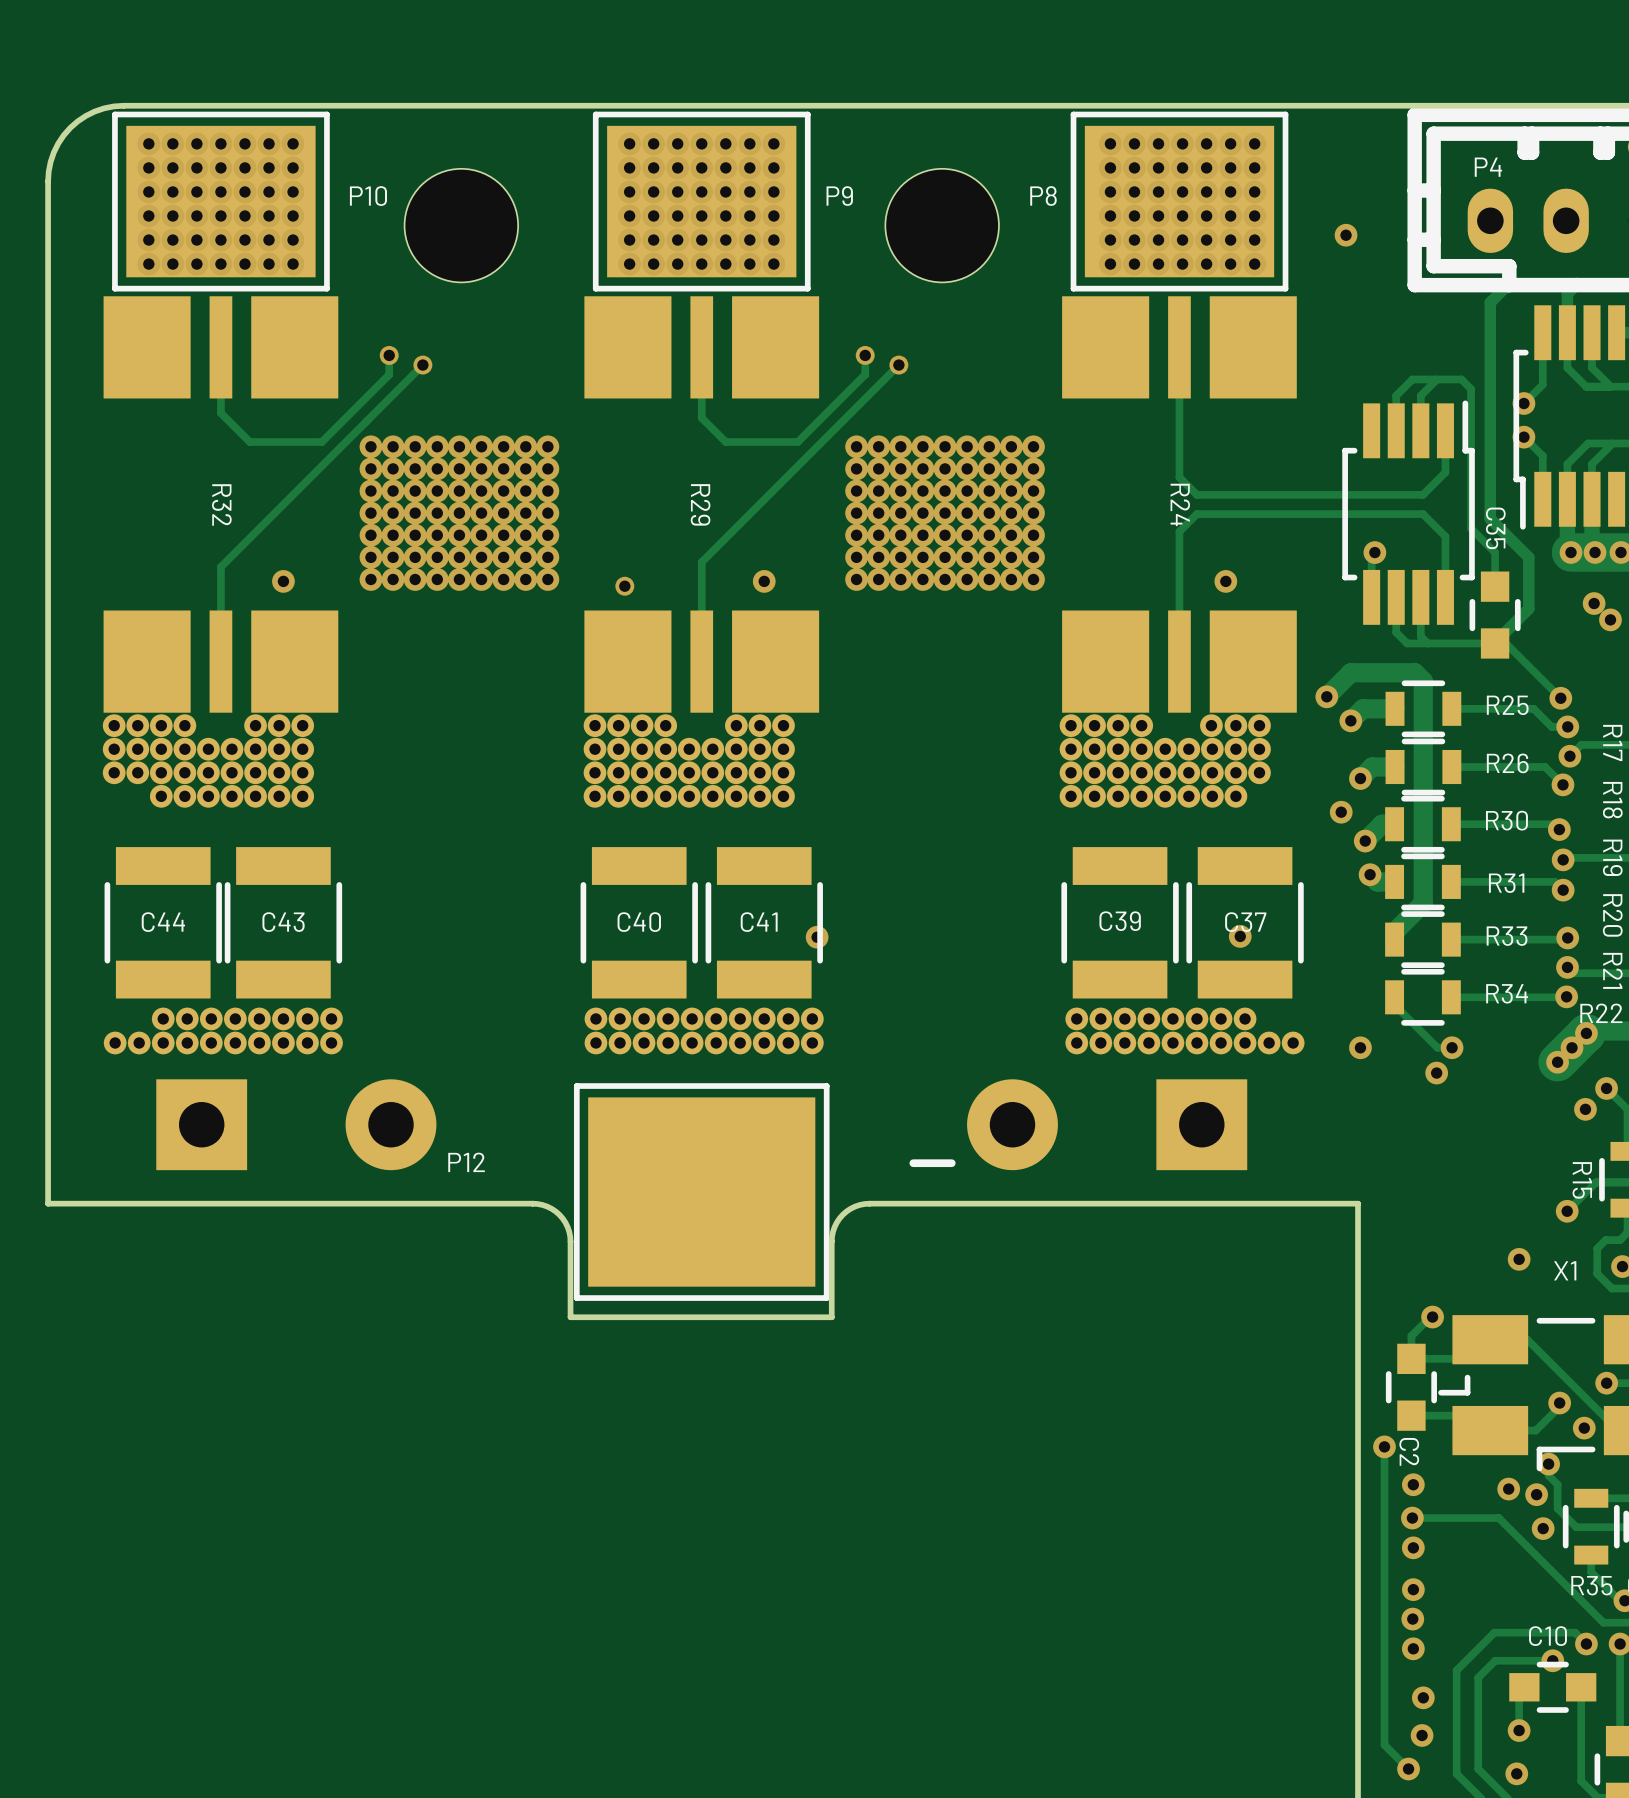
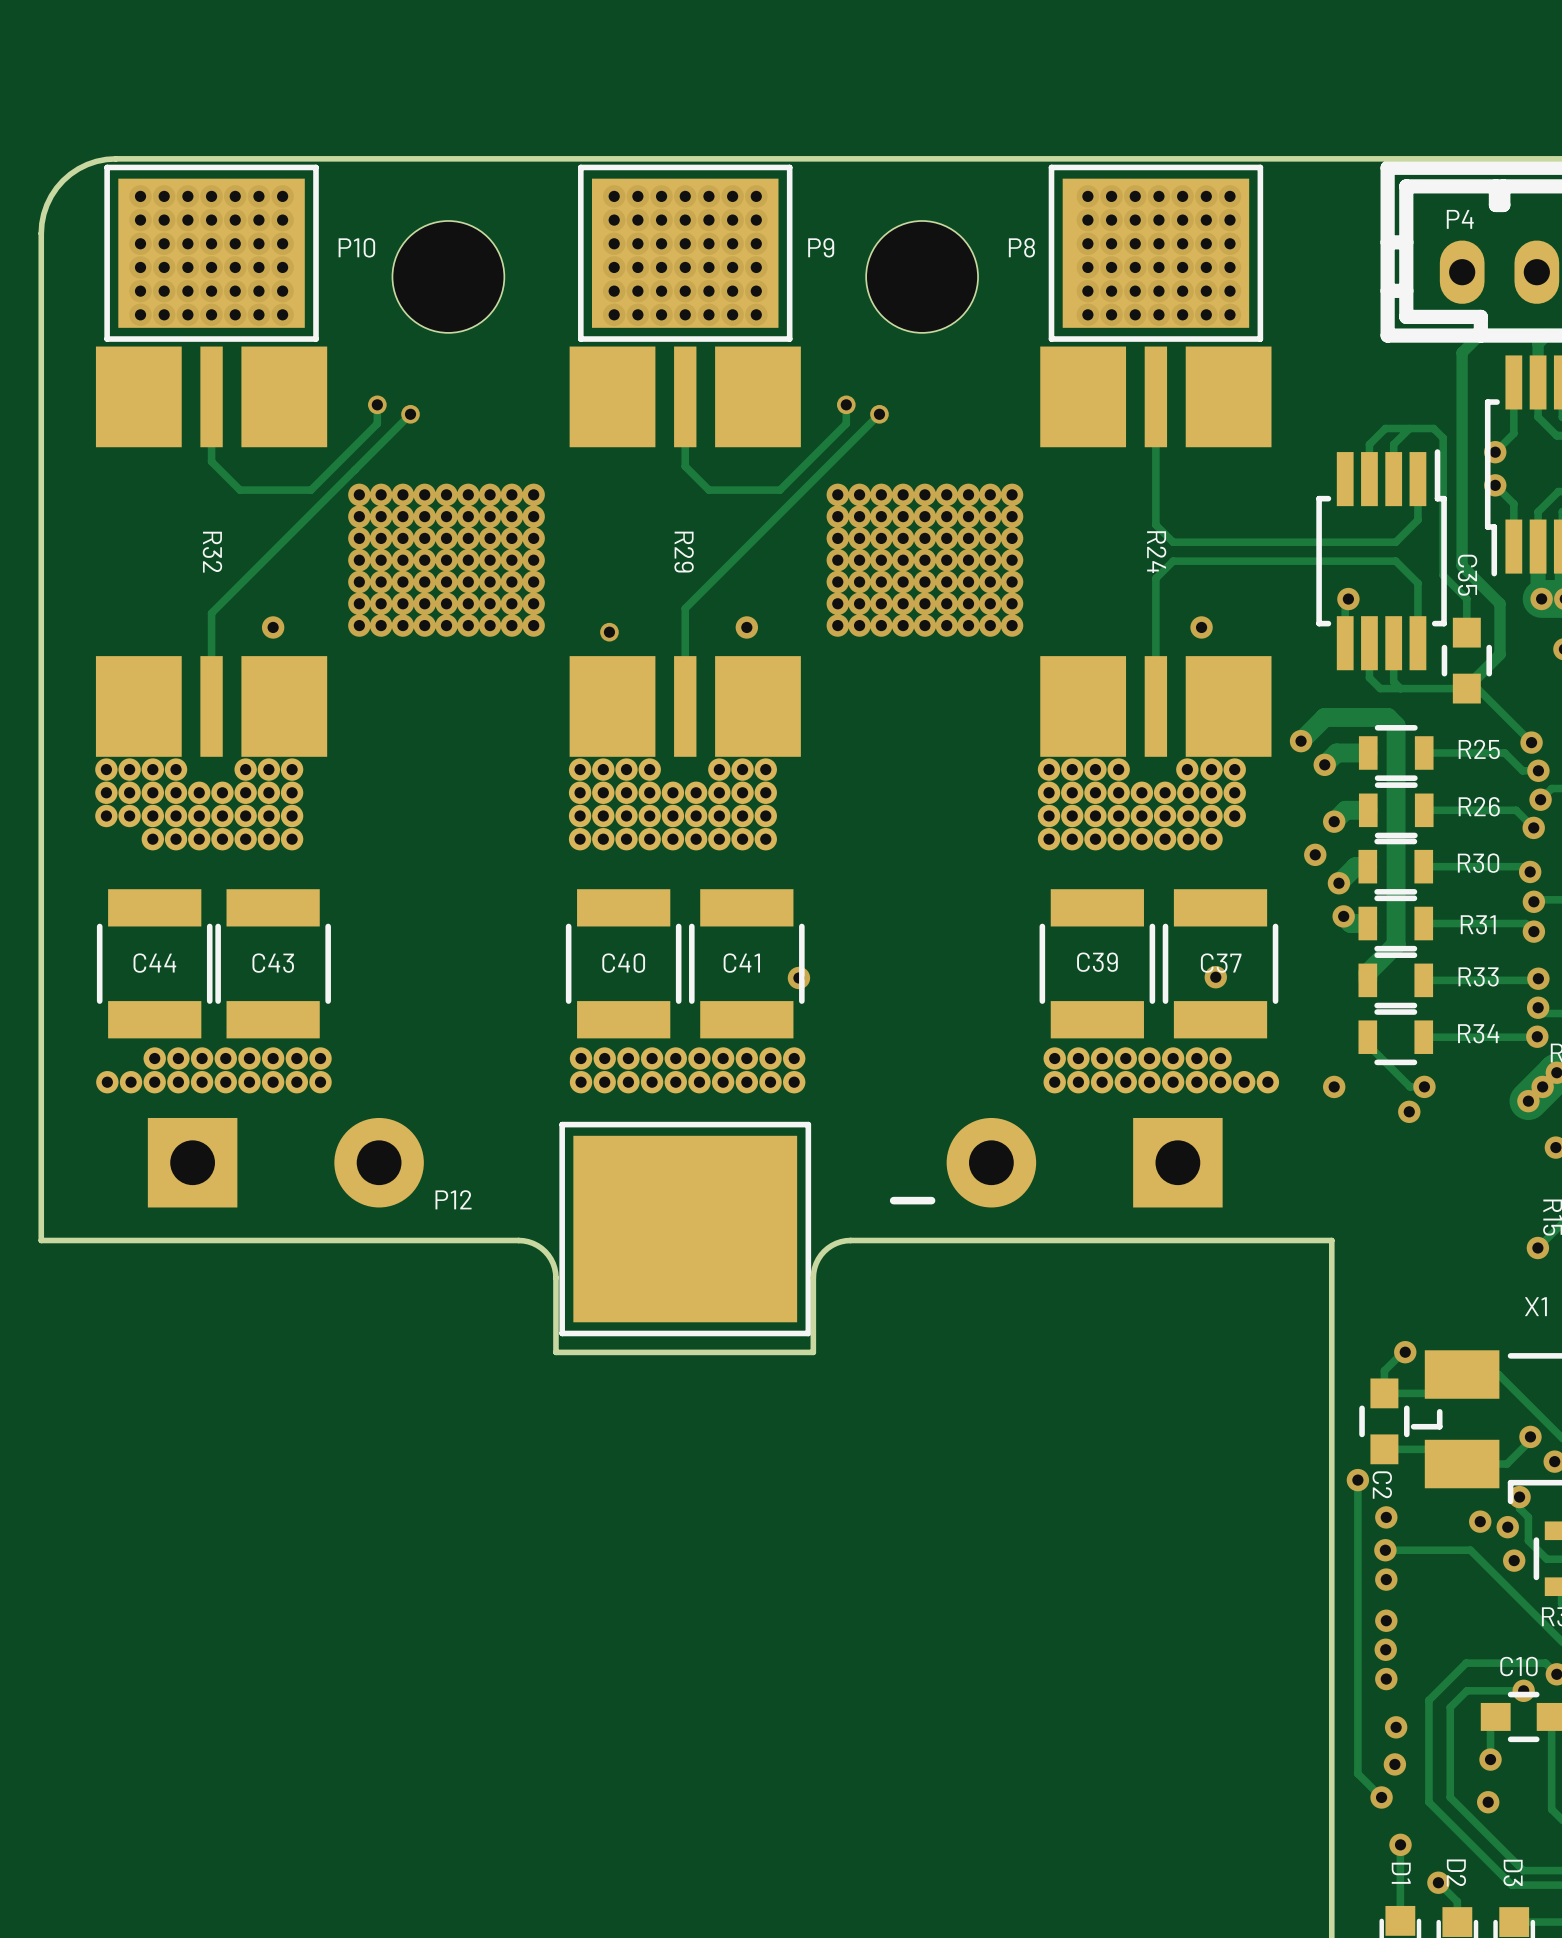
via: (1346, 235) -> none
via: (1519, 1259) -> none

